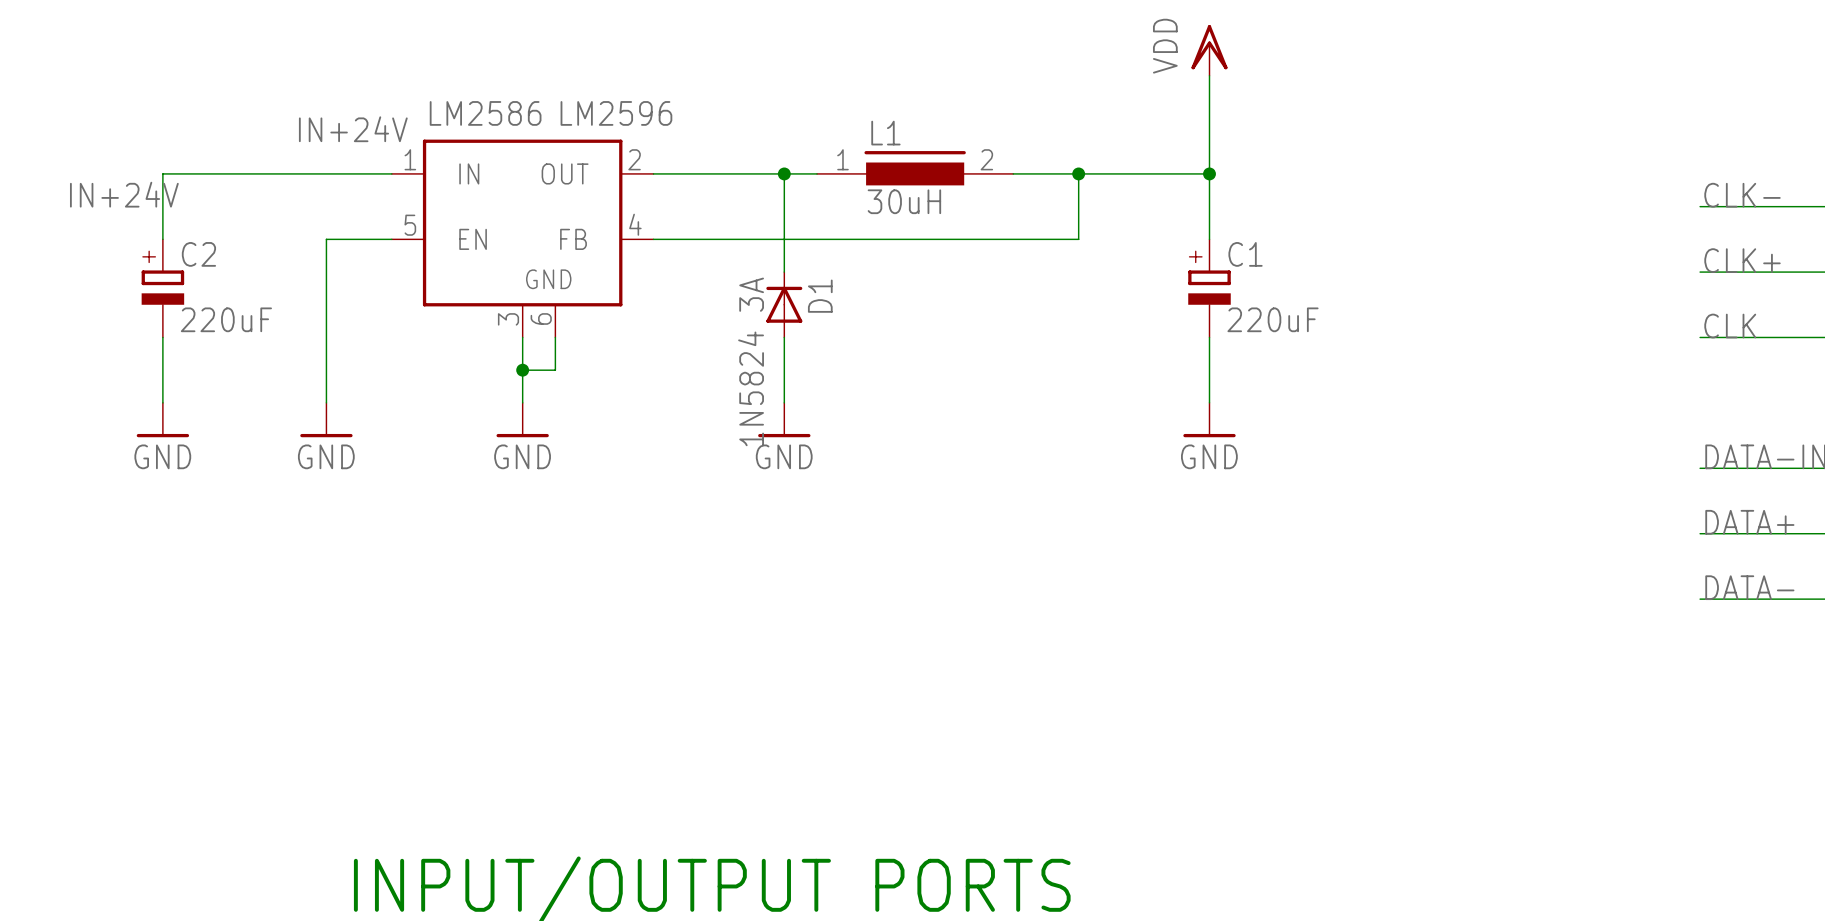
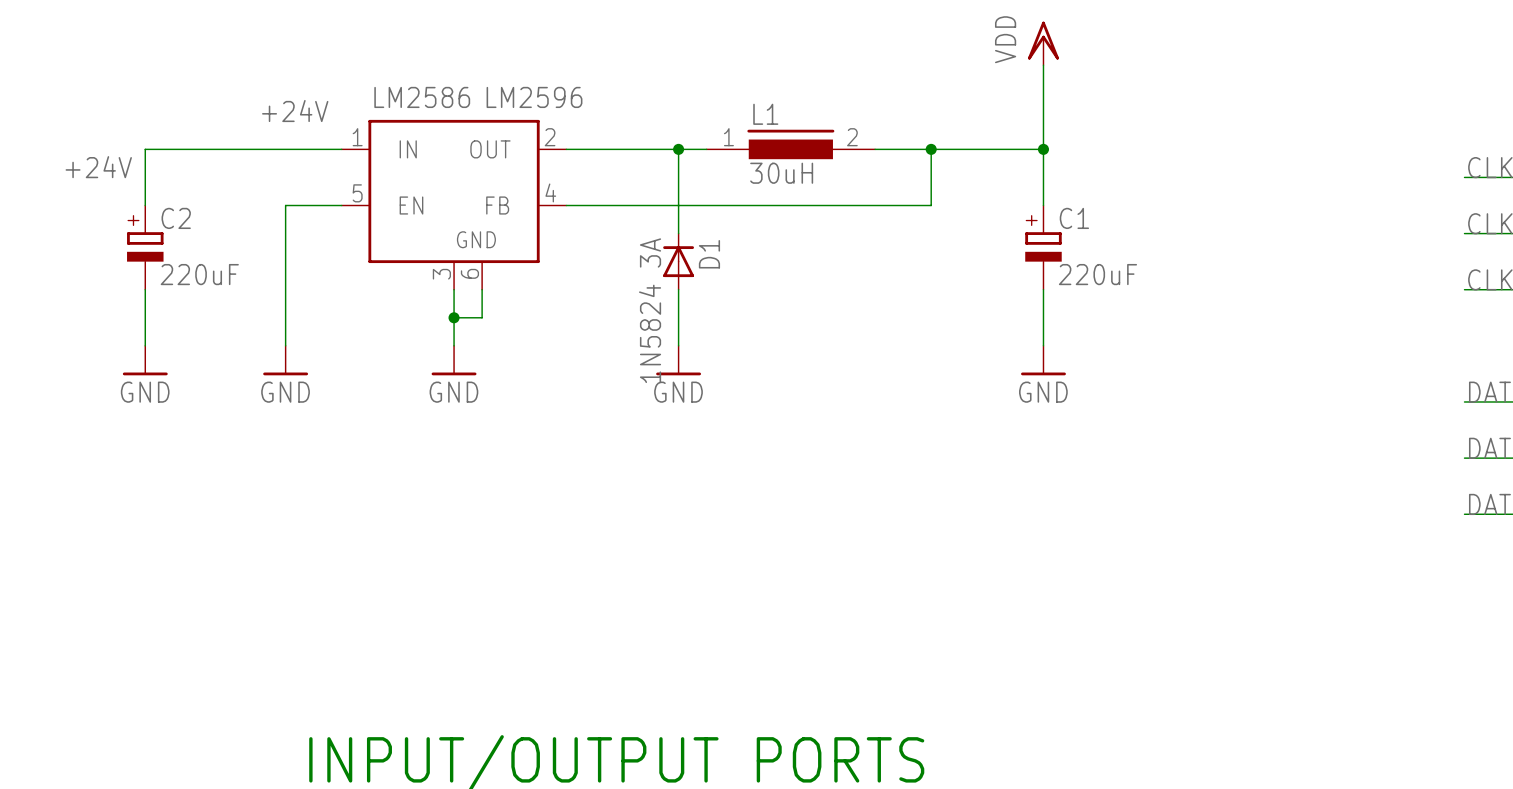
label: IN+24V (353, 129) -> +24V (295, 111)
label: IN+24V (124, 194) -> +24V (98, 167)

